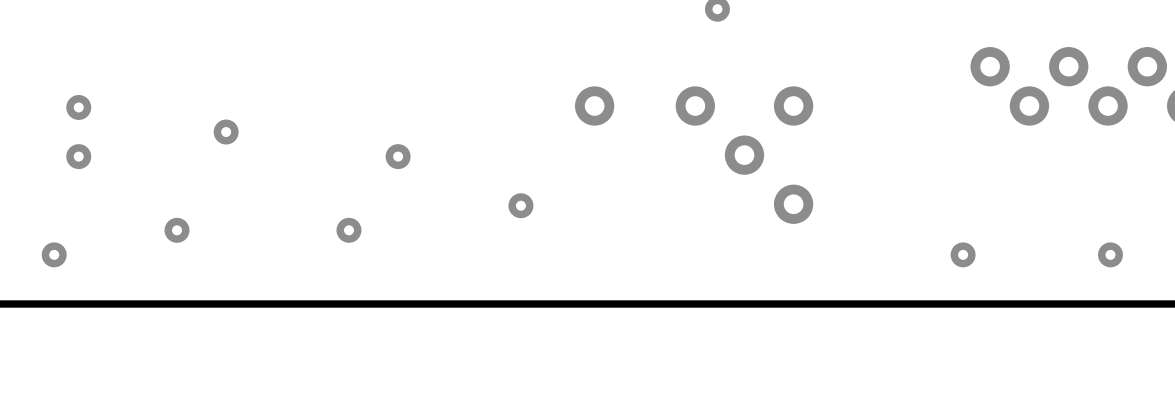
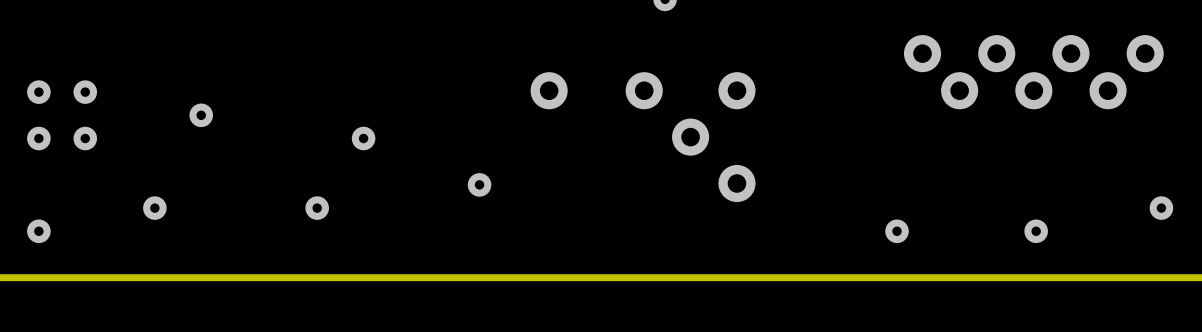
via: none -> (38, 92)
via: (78, 107) -> none
via: none -> (85, 92)
via: none -> (38, 138)
via: (78, 156) -> none
via: none -> (85, 138)

